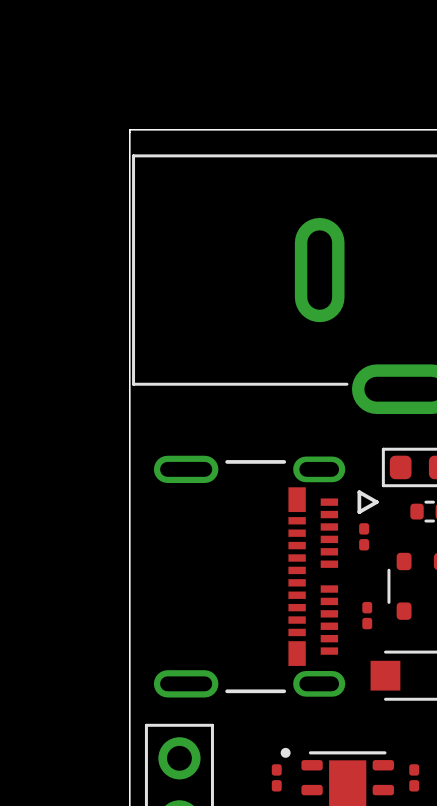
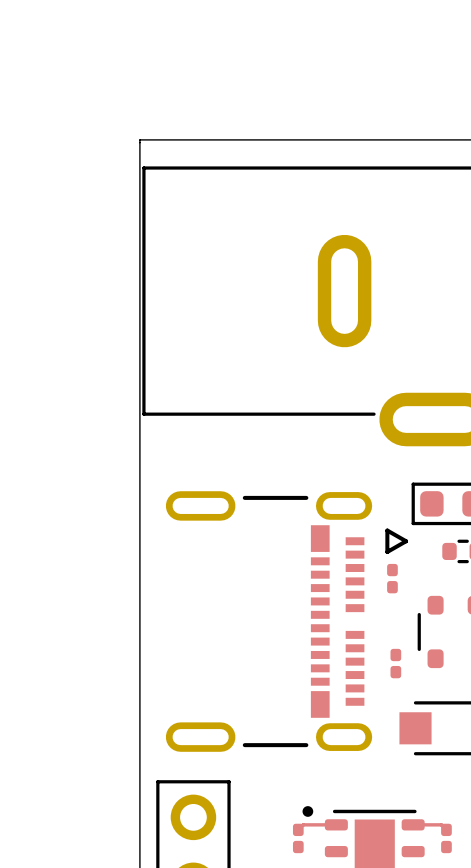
track: none -> (336, 824) (303, 824) (298, 829)
track: none -> (413, 824) (441, 824) (446, 829)

